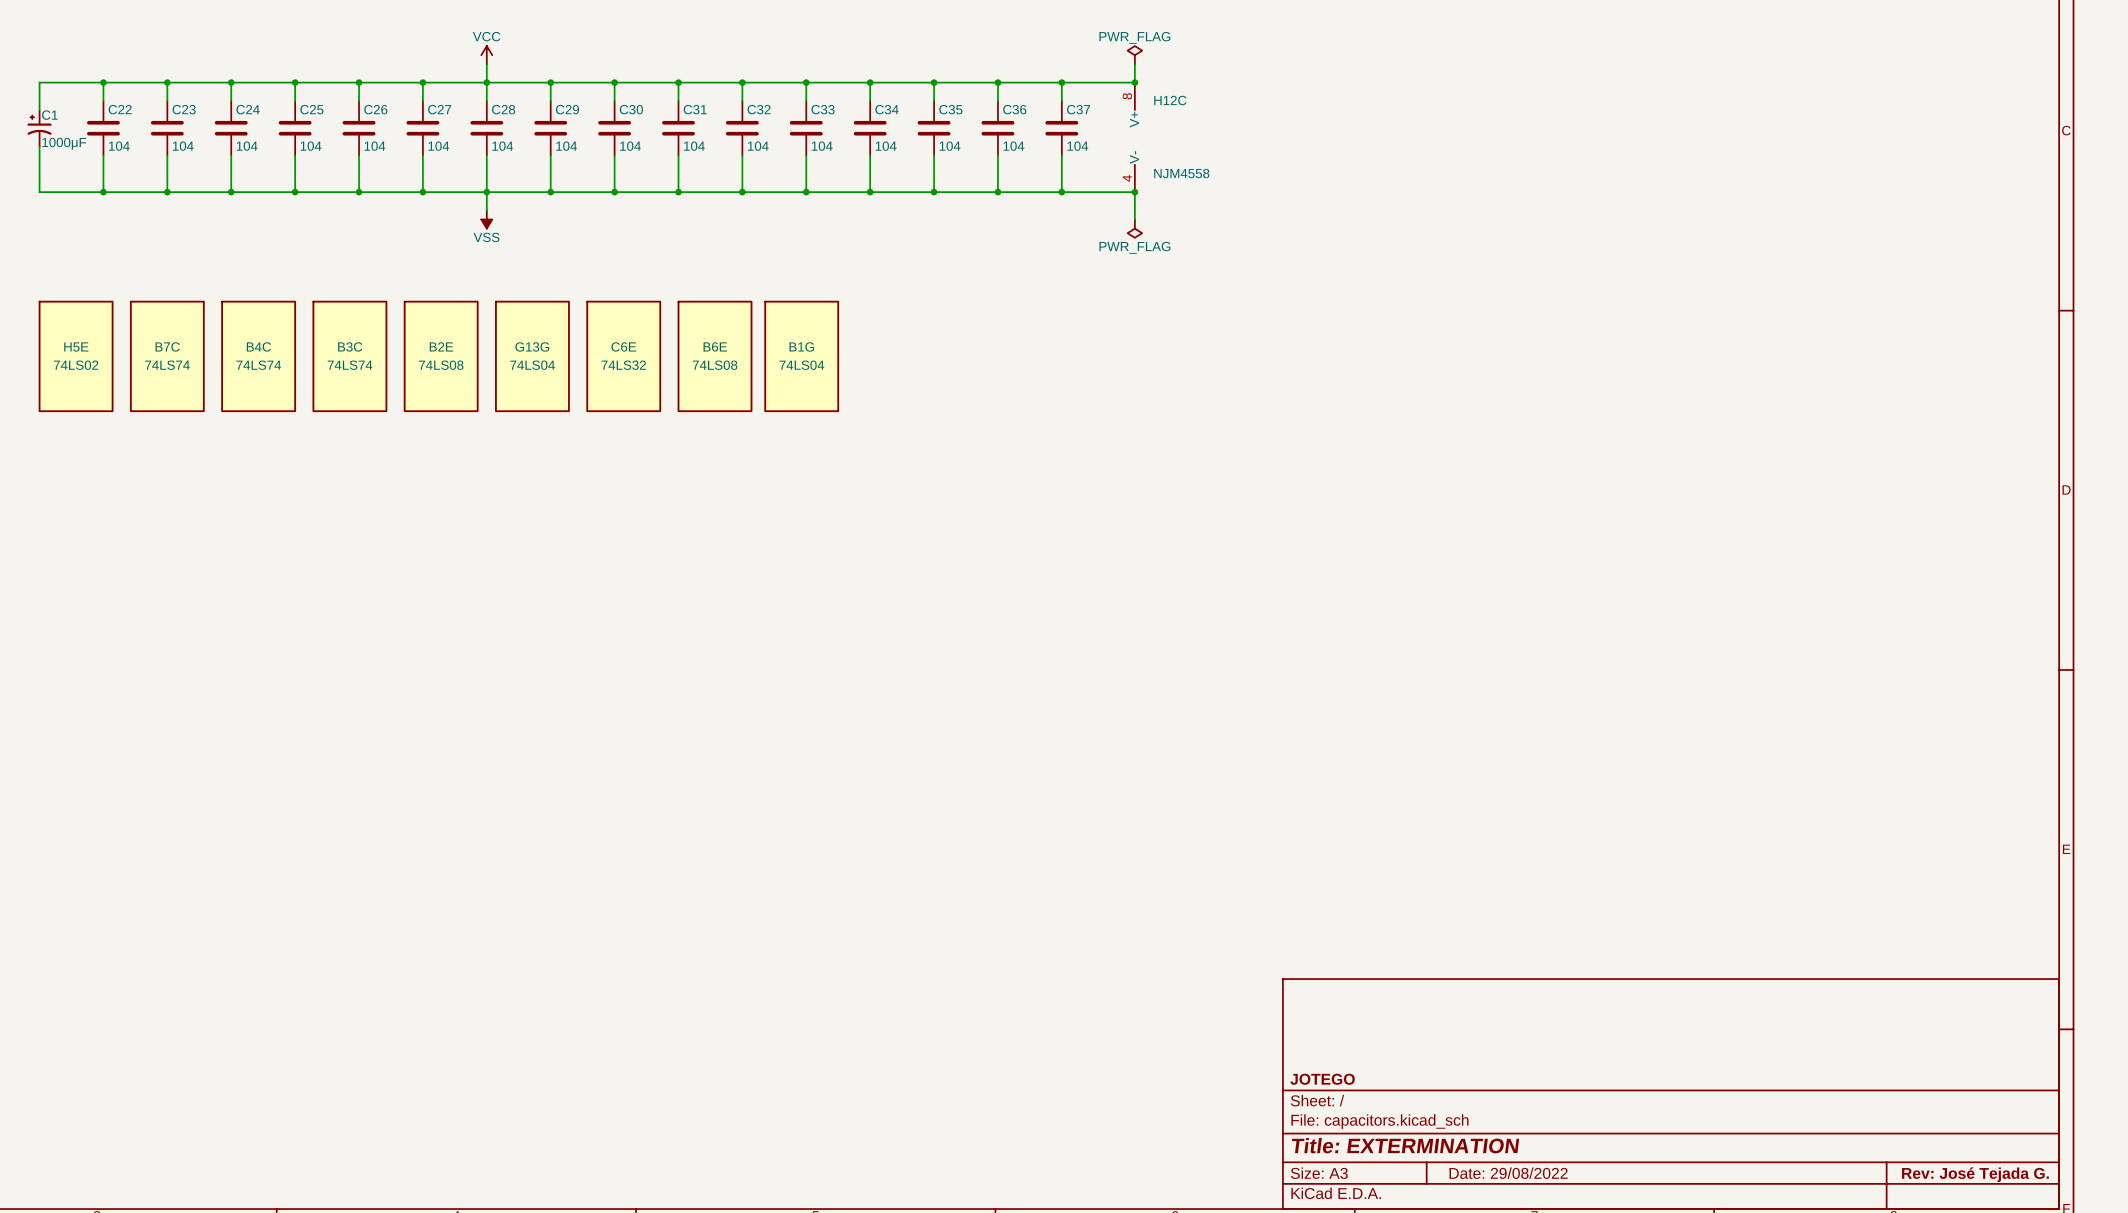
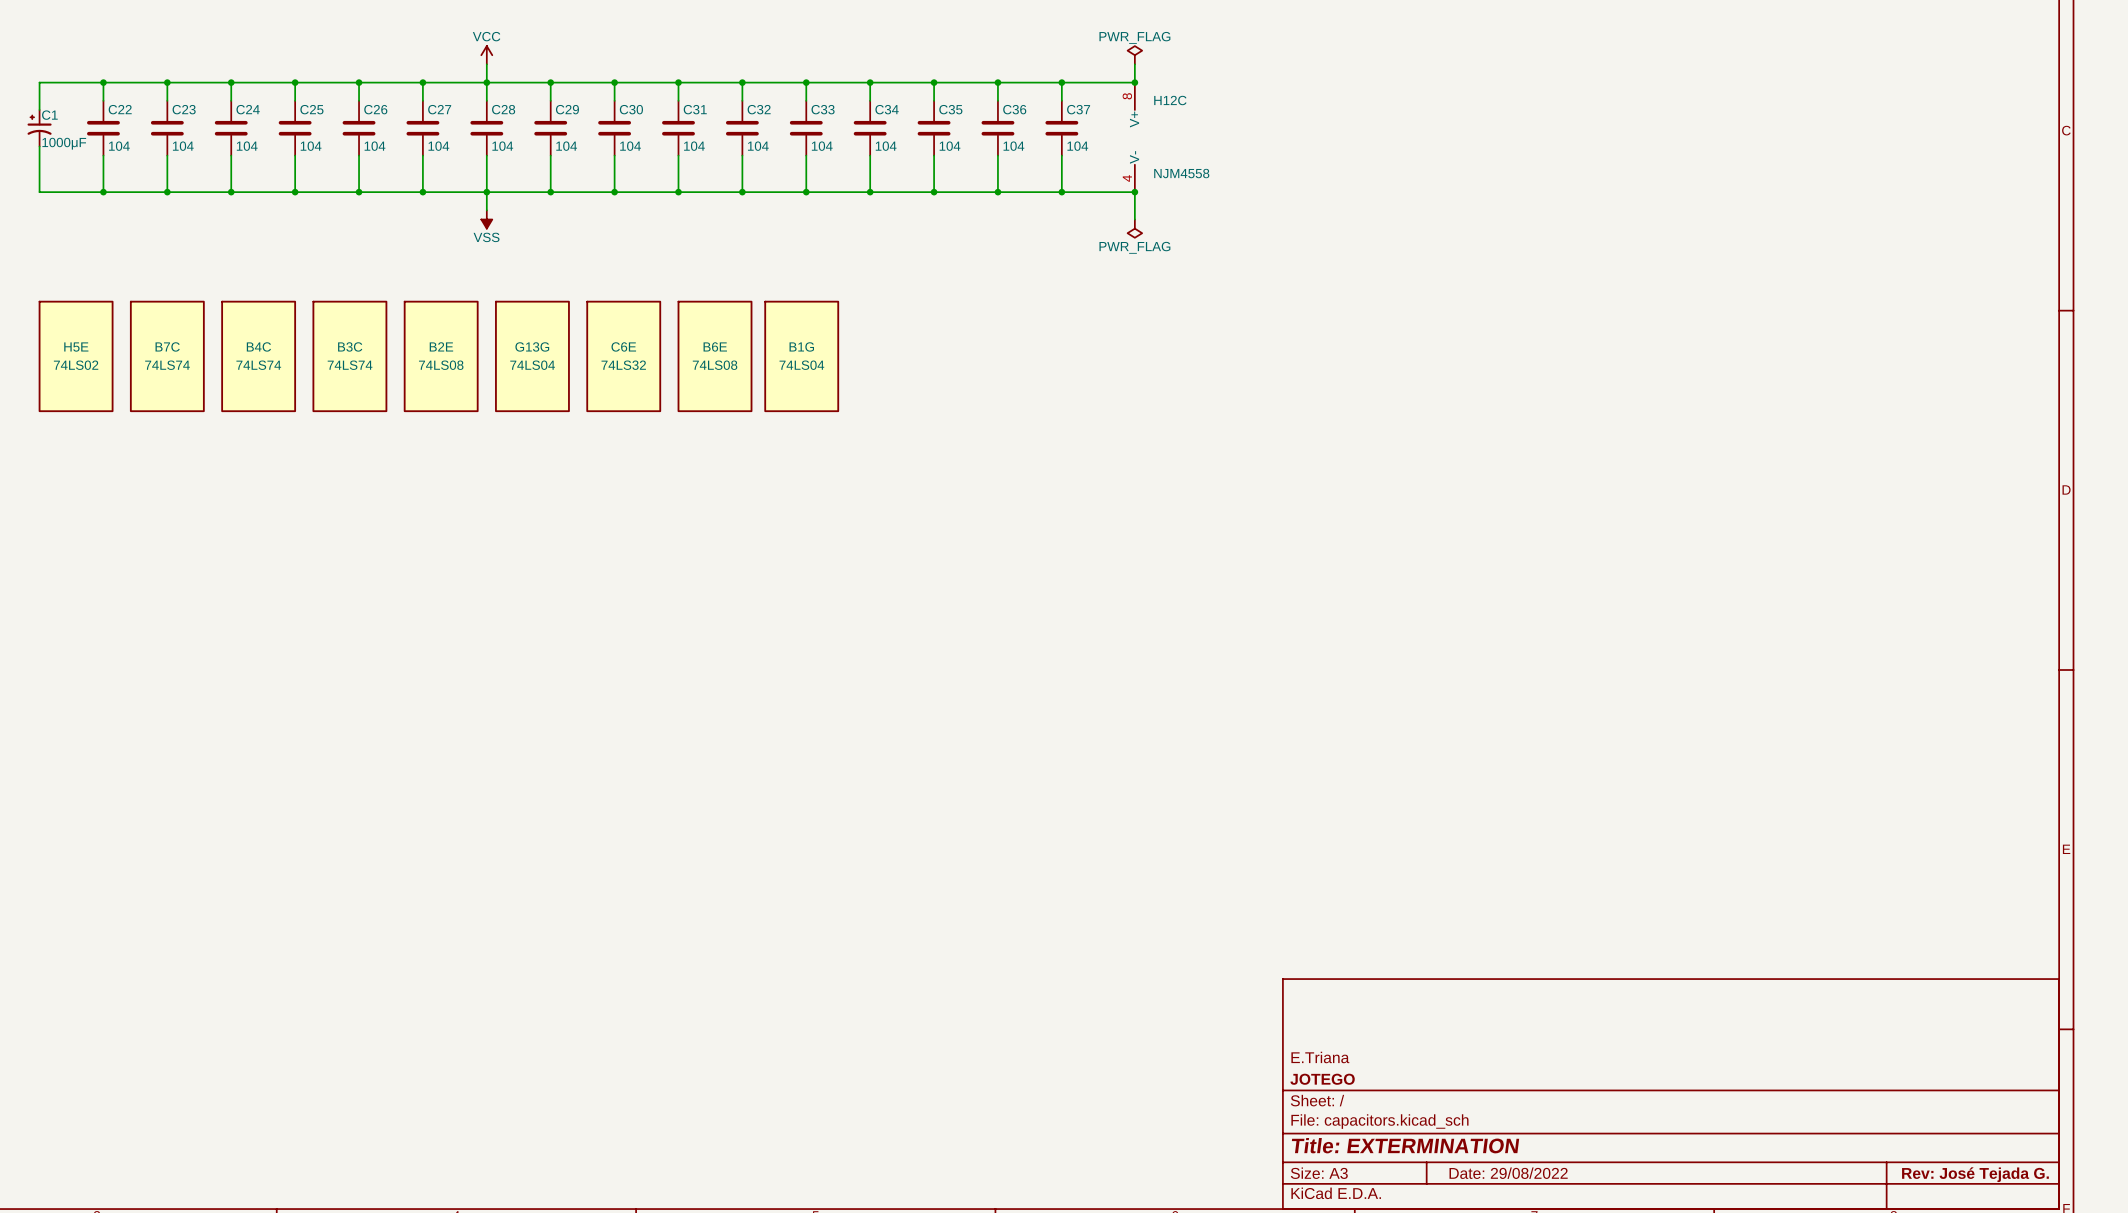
title block: none -> E.Triana (1320, 1057)

